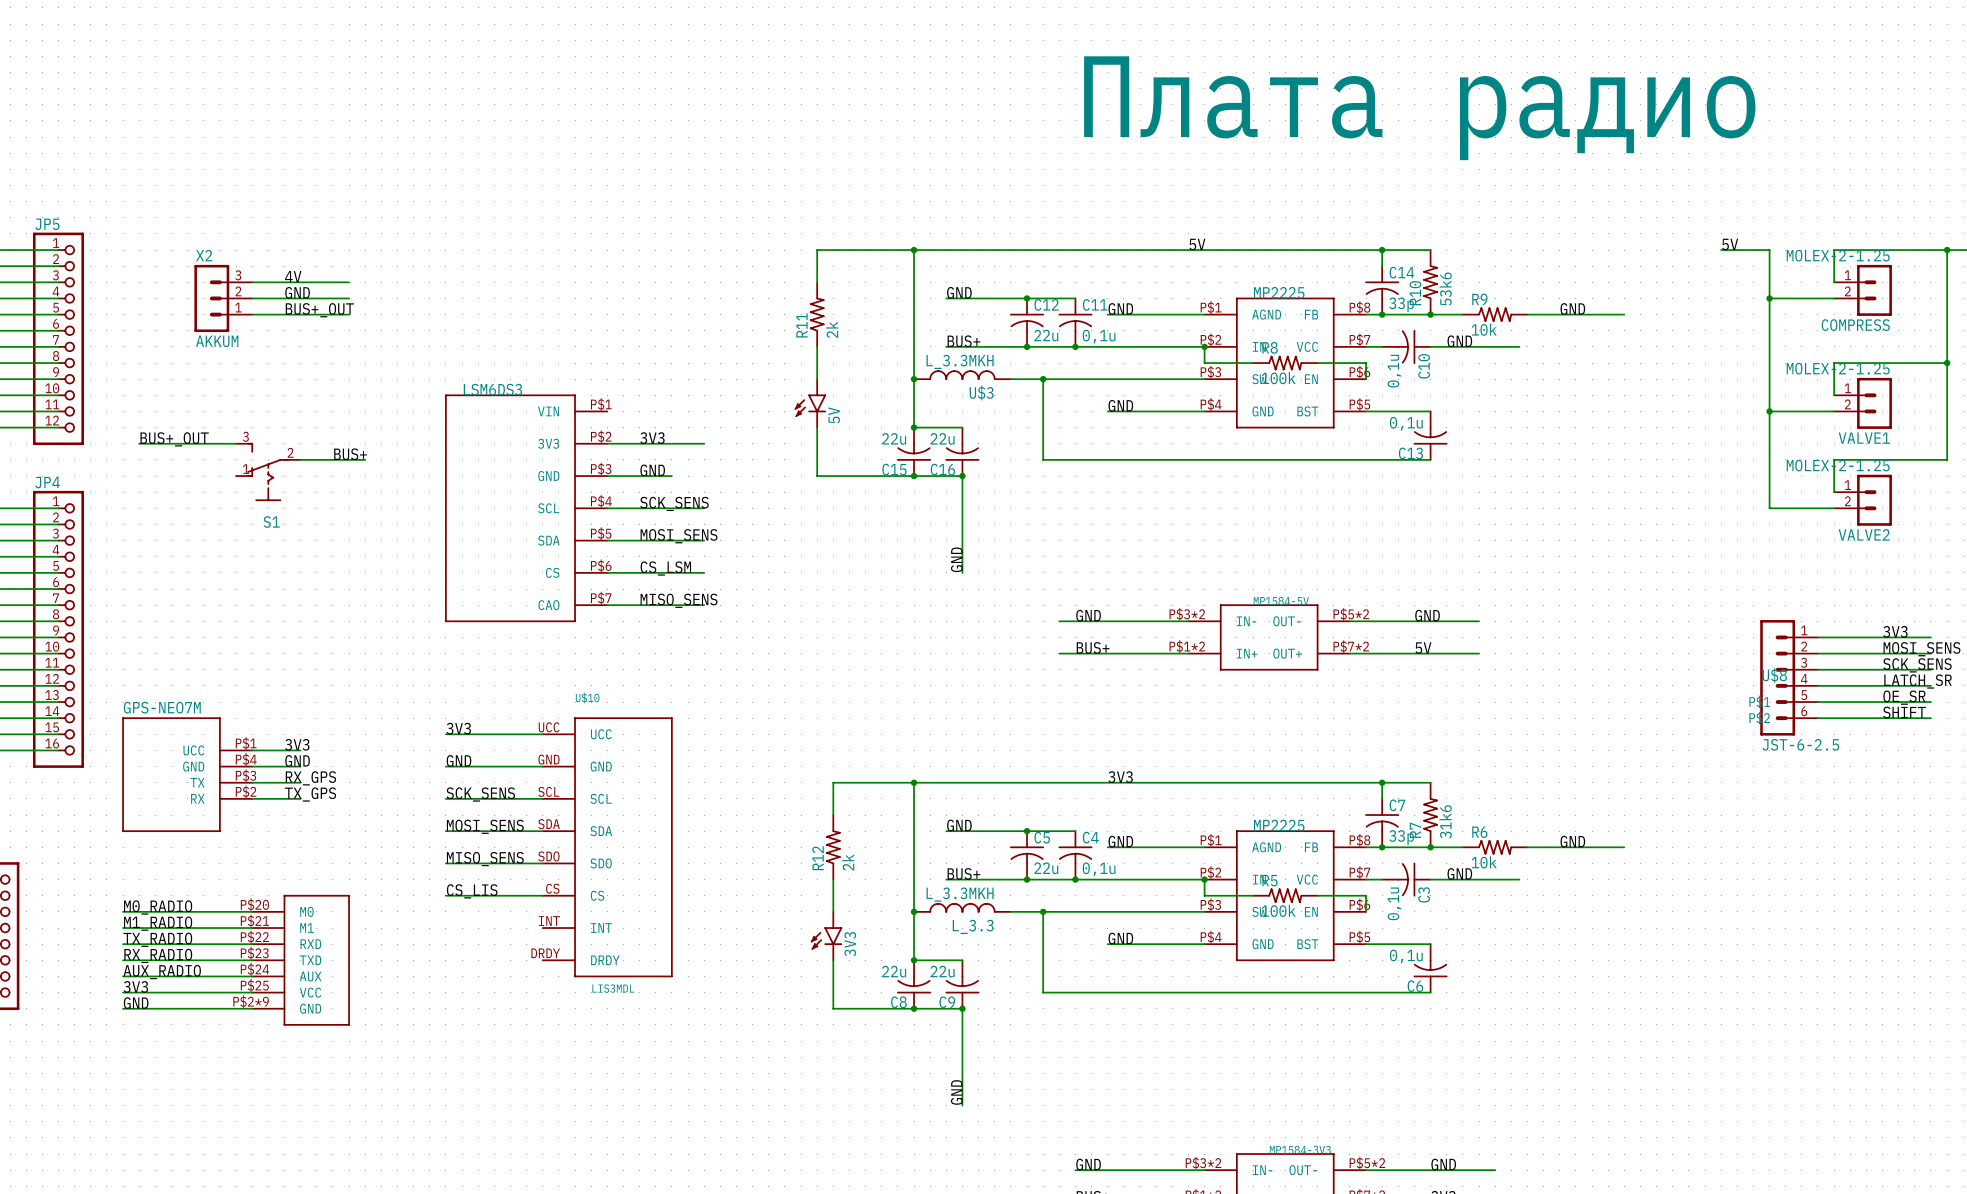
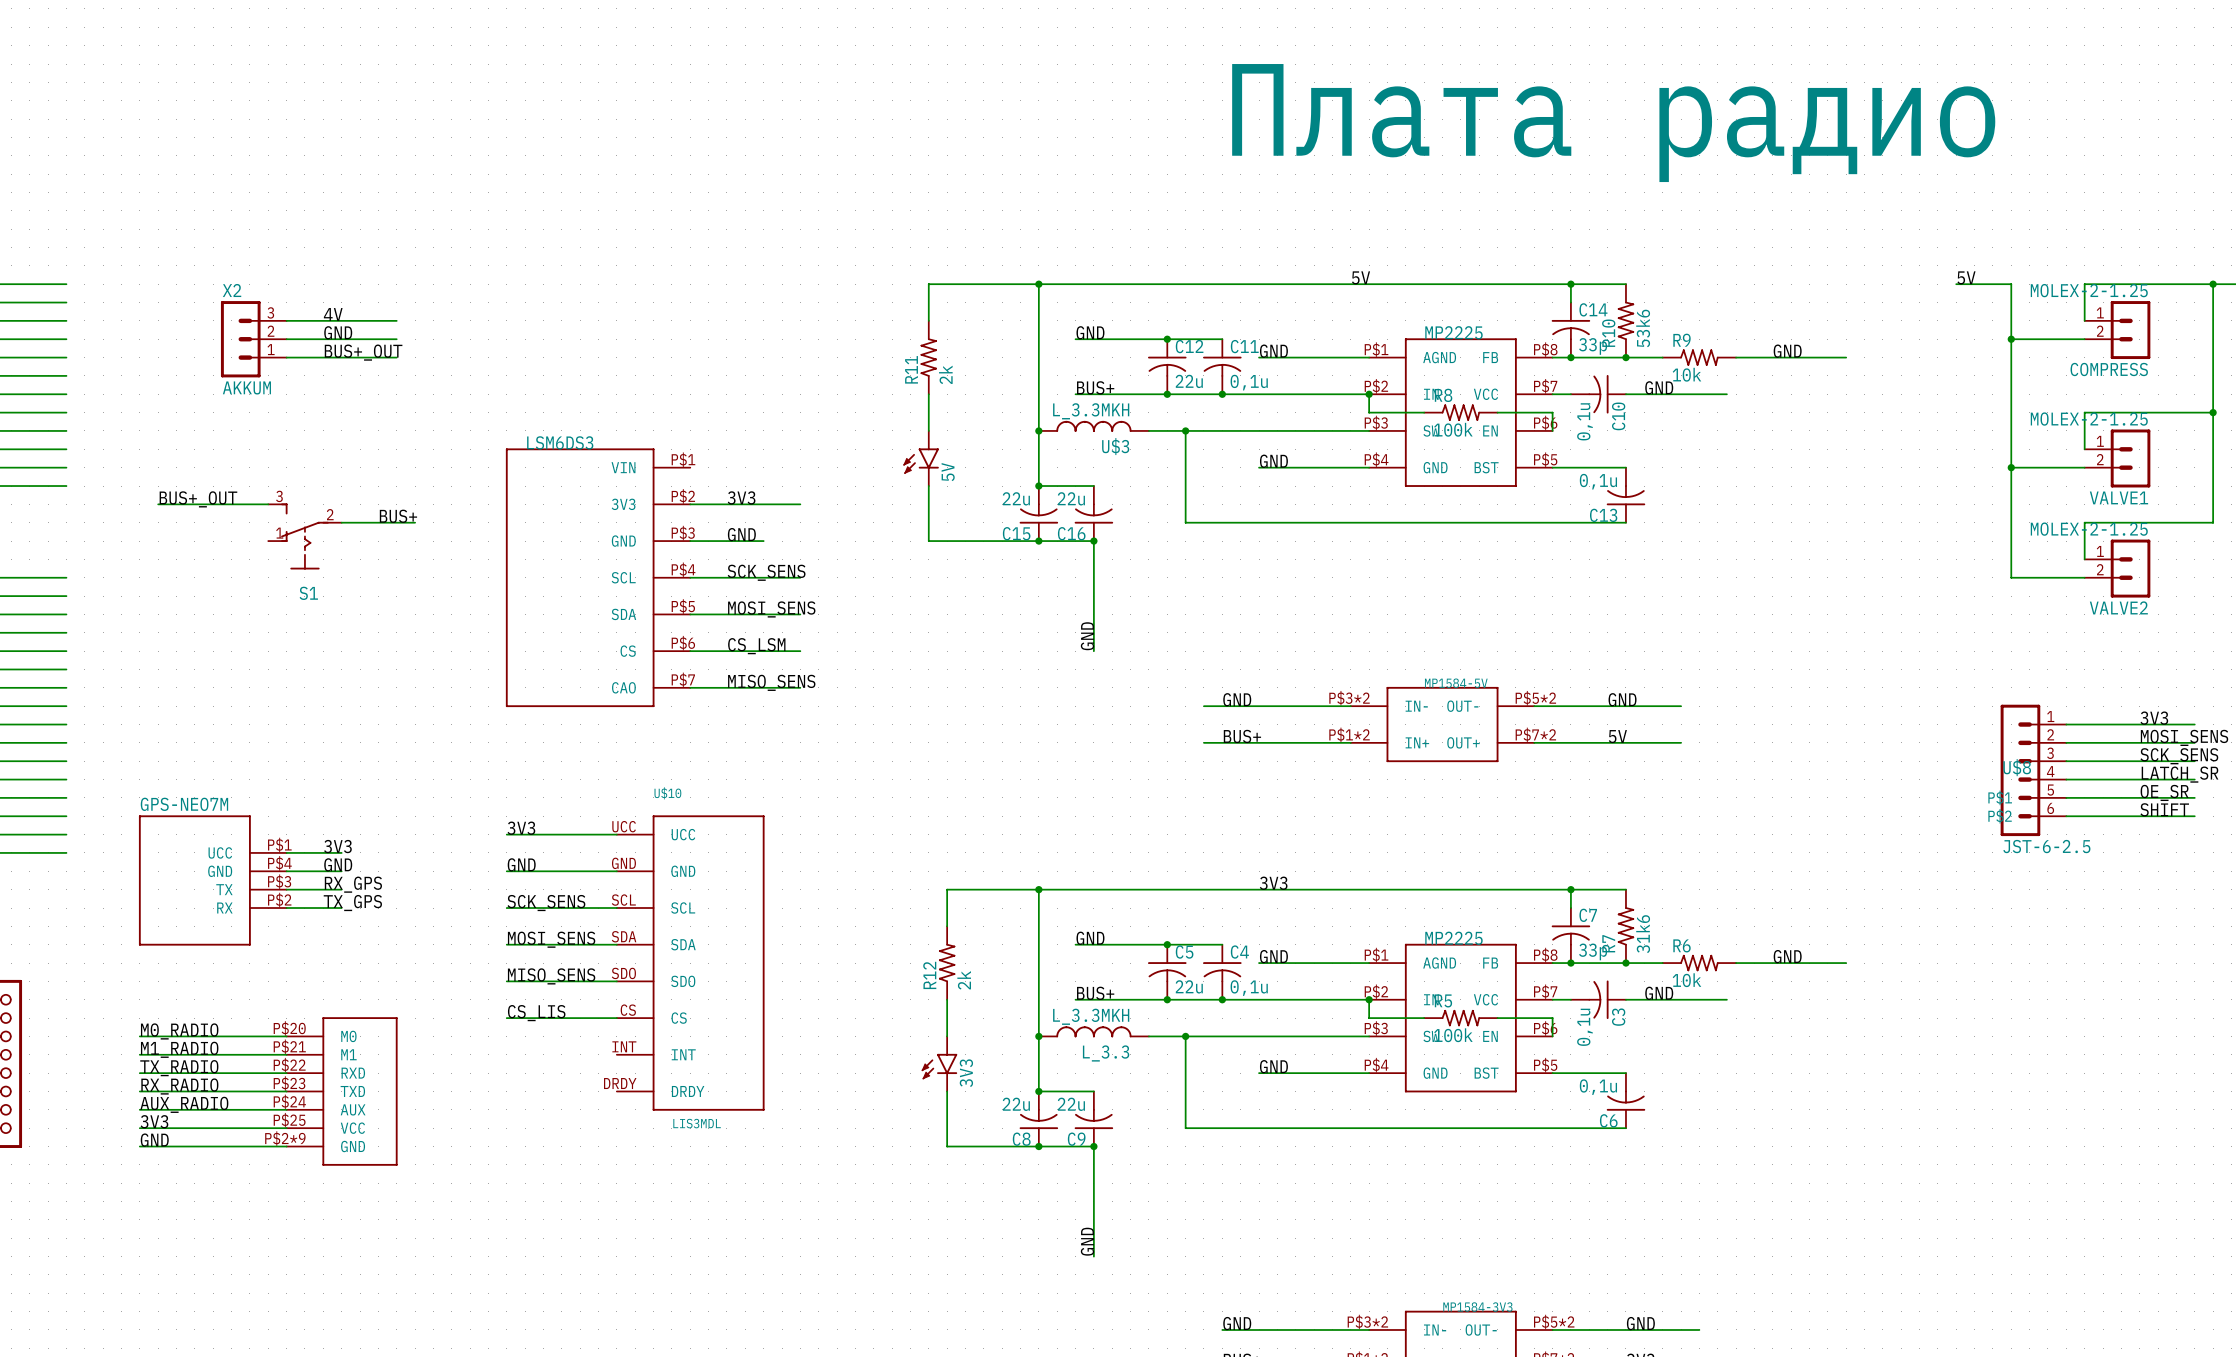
JP5: (58, 338) -> none
JP4: (58, 629) -> none

